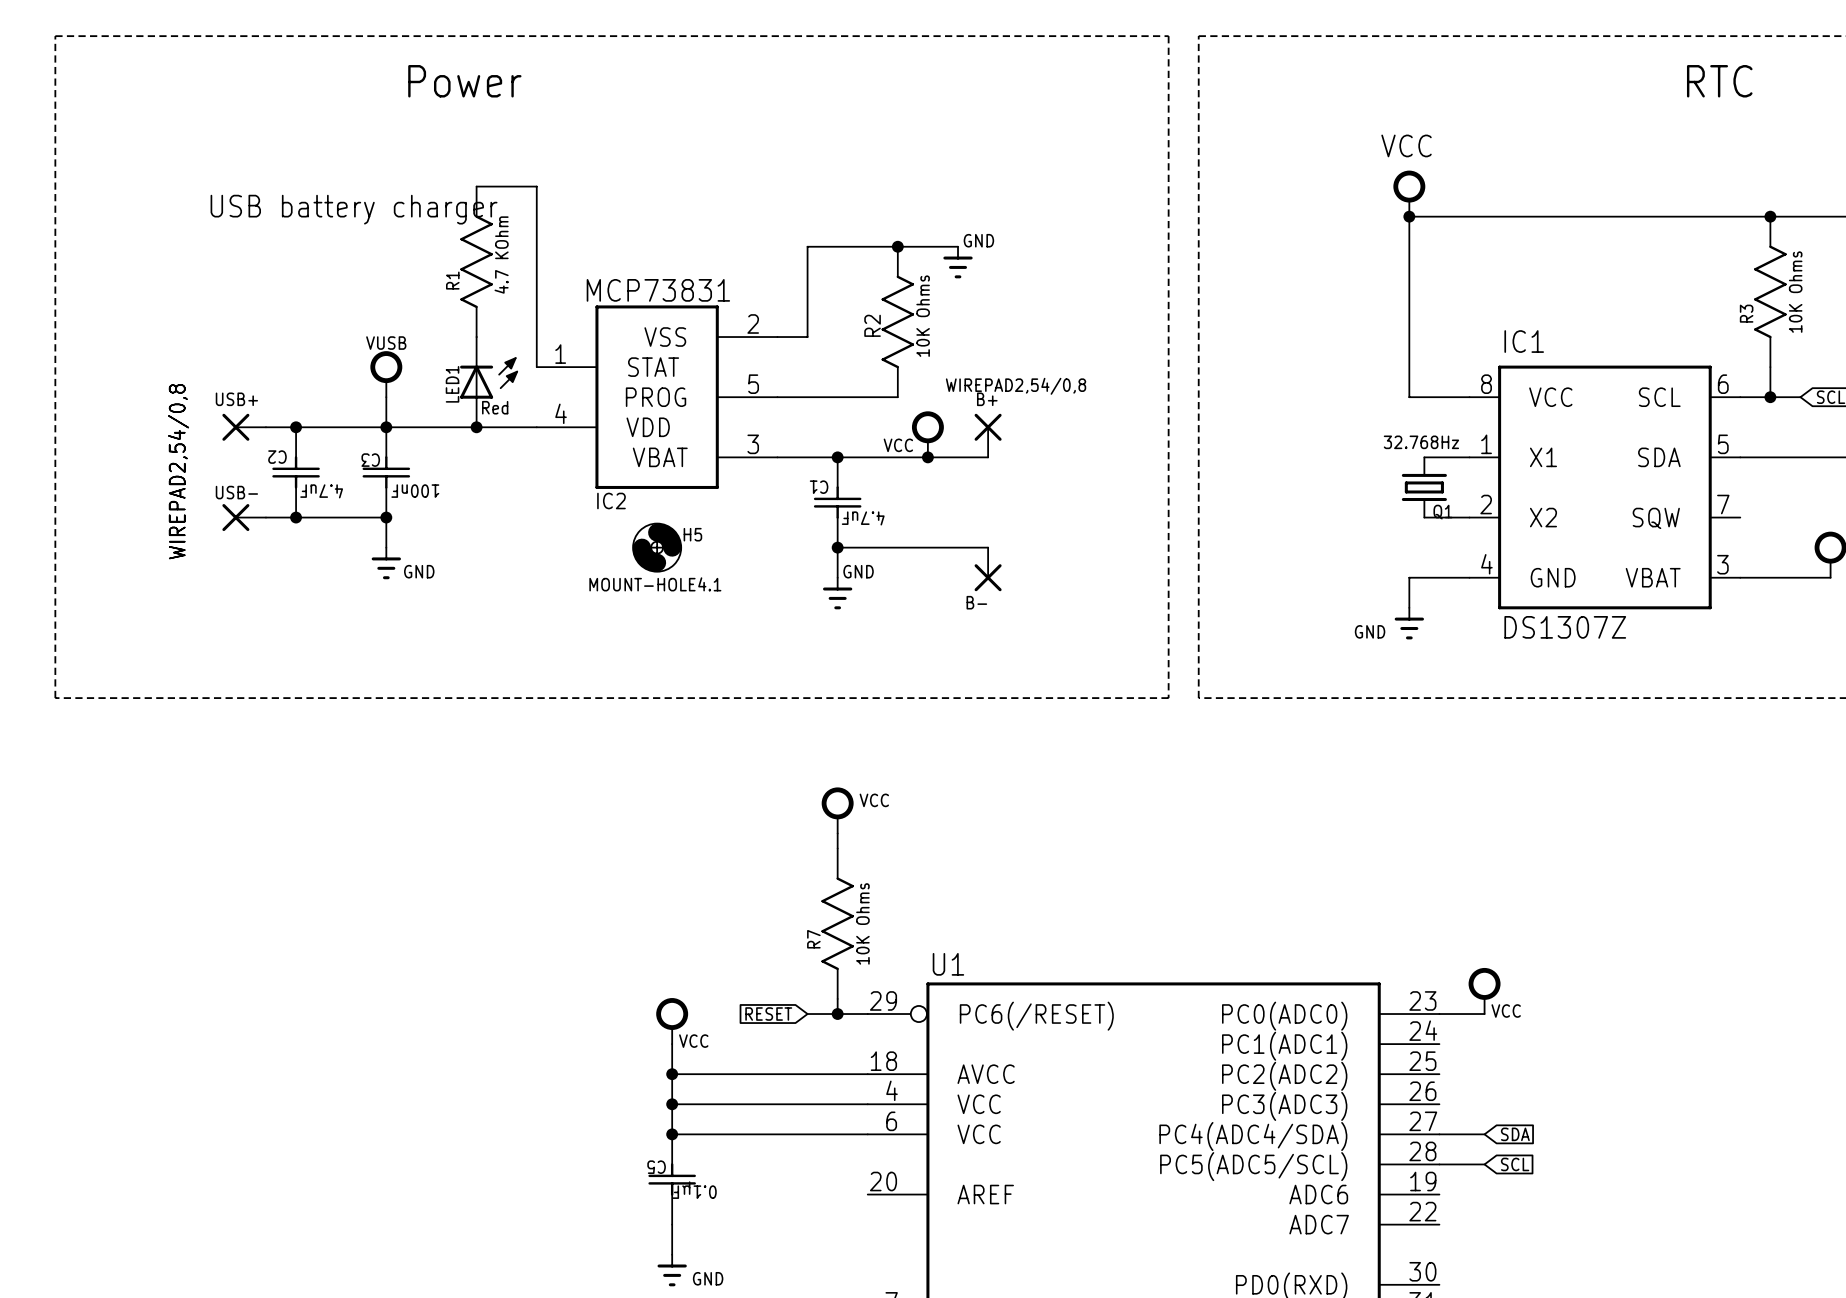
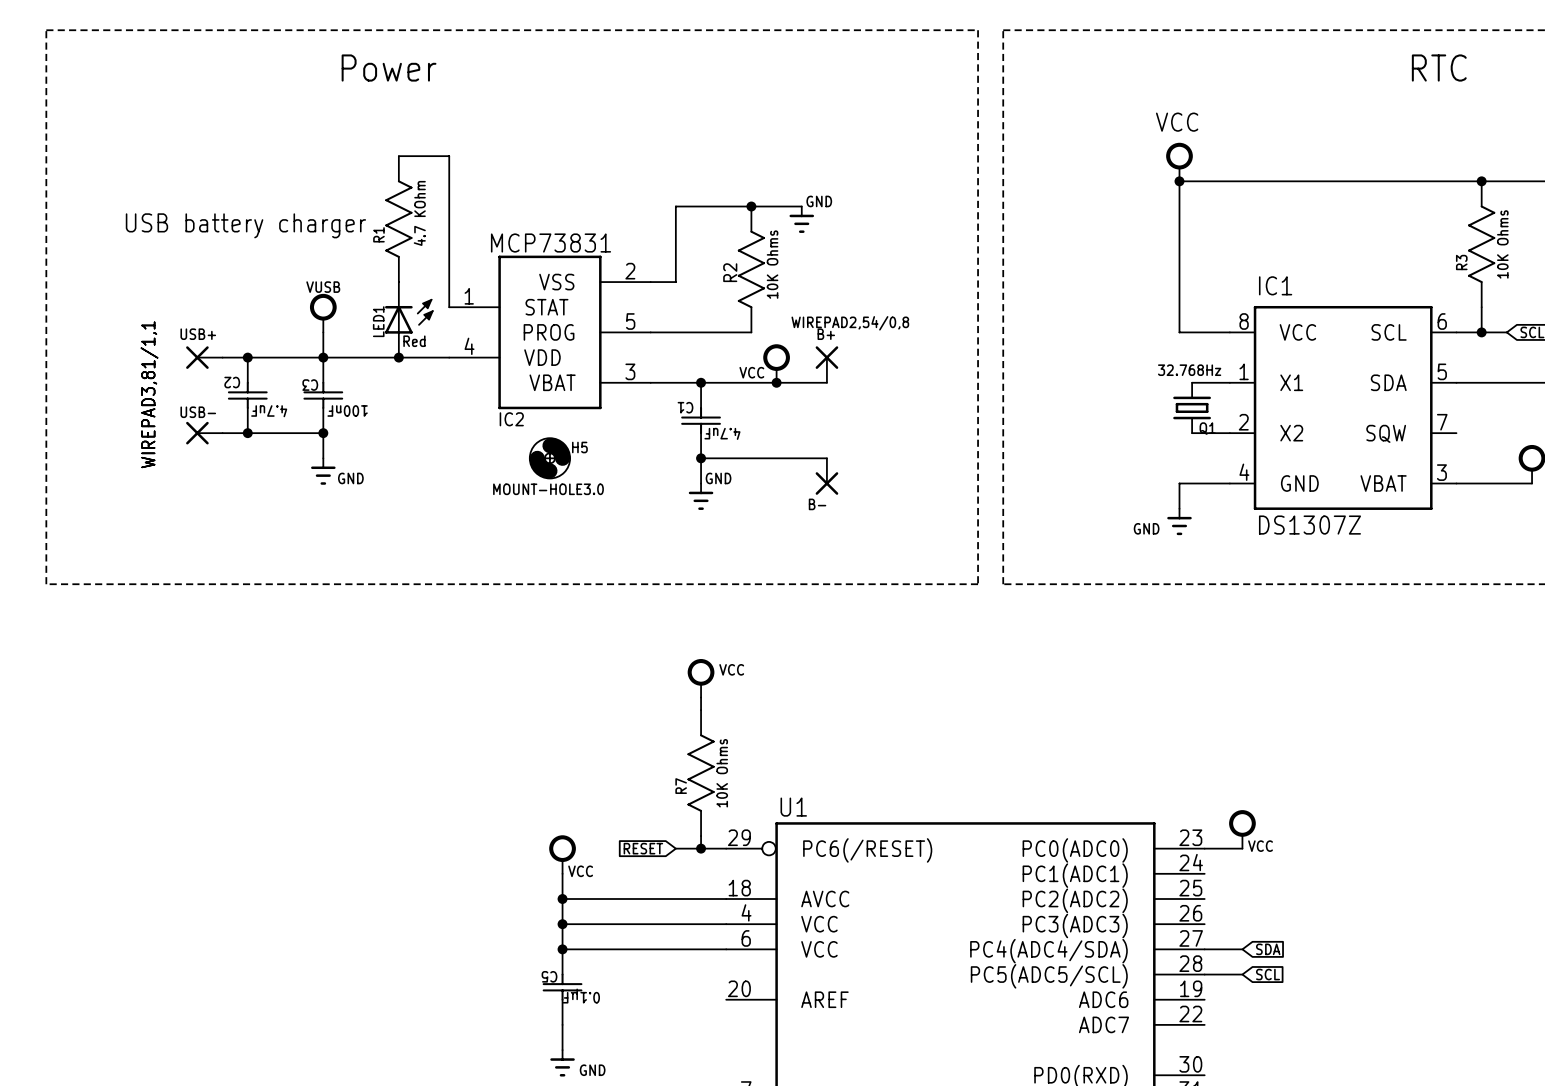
text position: USB battery charger (354, 209) -> USB battery charger (245, 225)
USB+ value: WIREPAD2,54/0,8 (178, 471) -> WIREPAD3,81/1,1 (149, 394)
USB- value: WIREPAD2,54/0,8 (178, 471) -> WIREPAD3,81/1,1 (149, 394)
H5 value: MOUNT-HOLE4.1 (655, 584) -> MOUNT-HOLE3.0 (548, 489)

